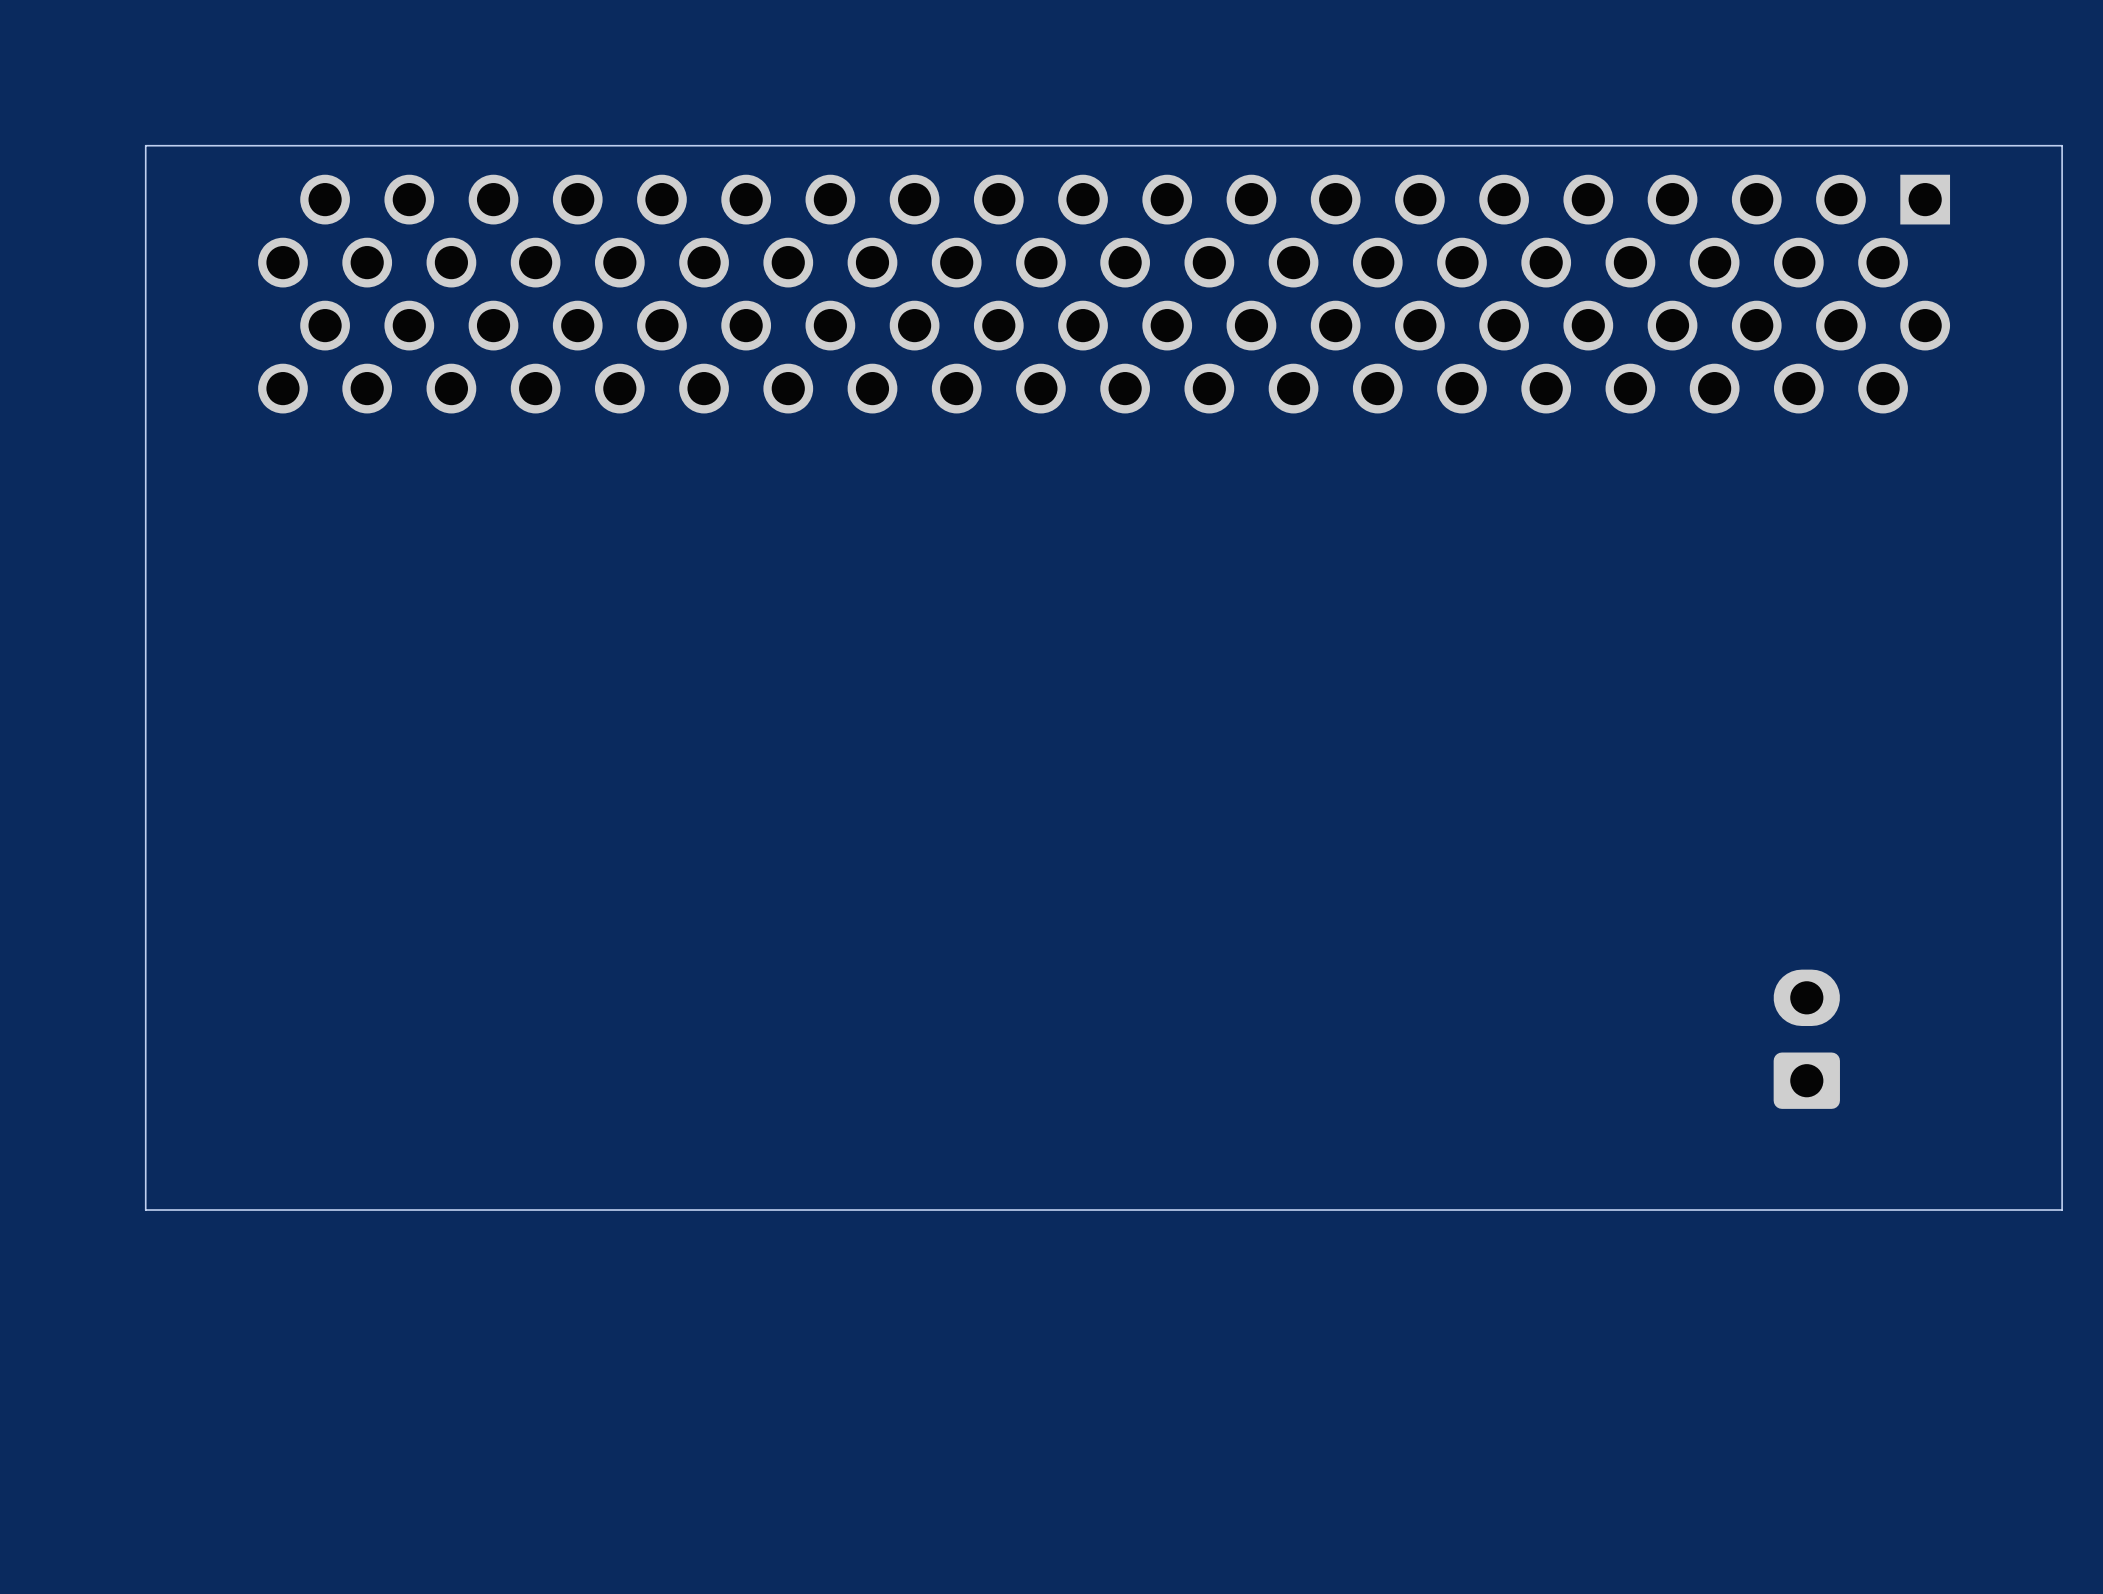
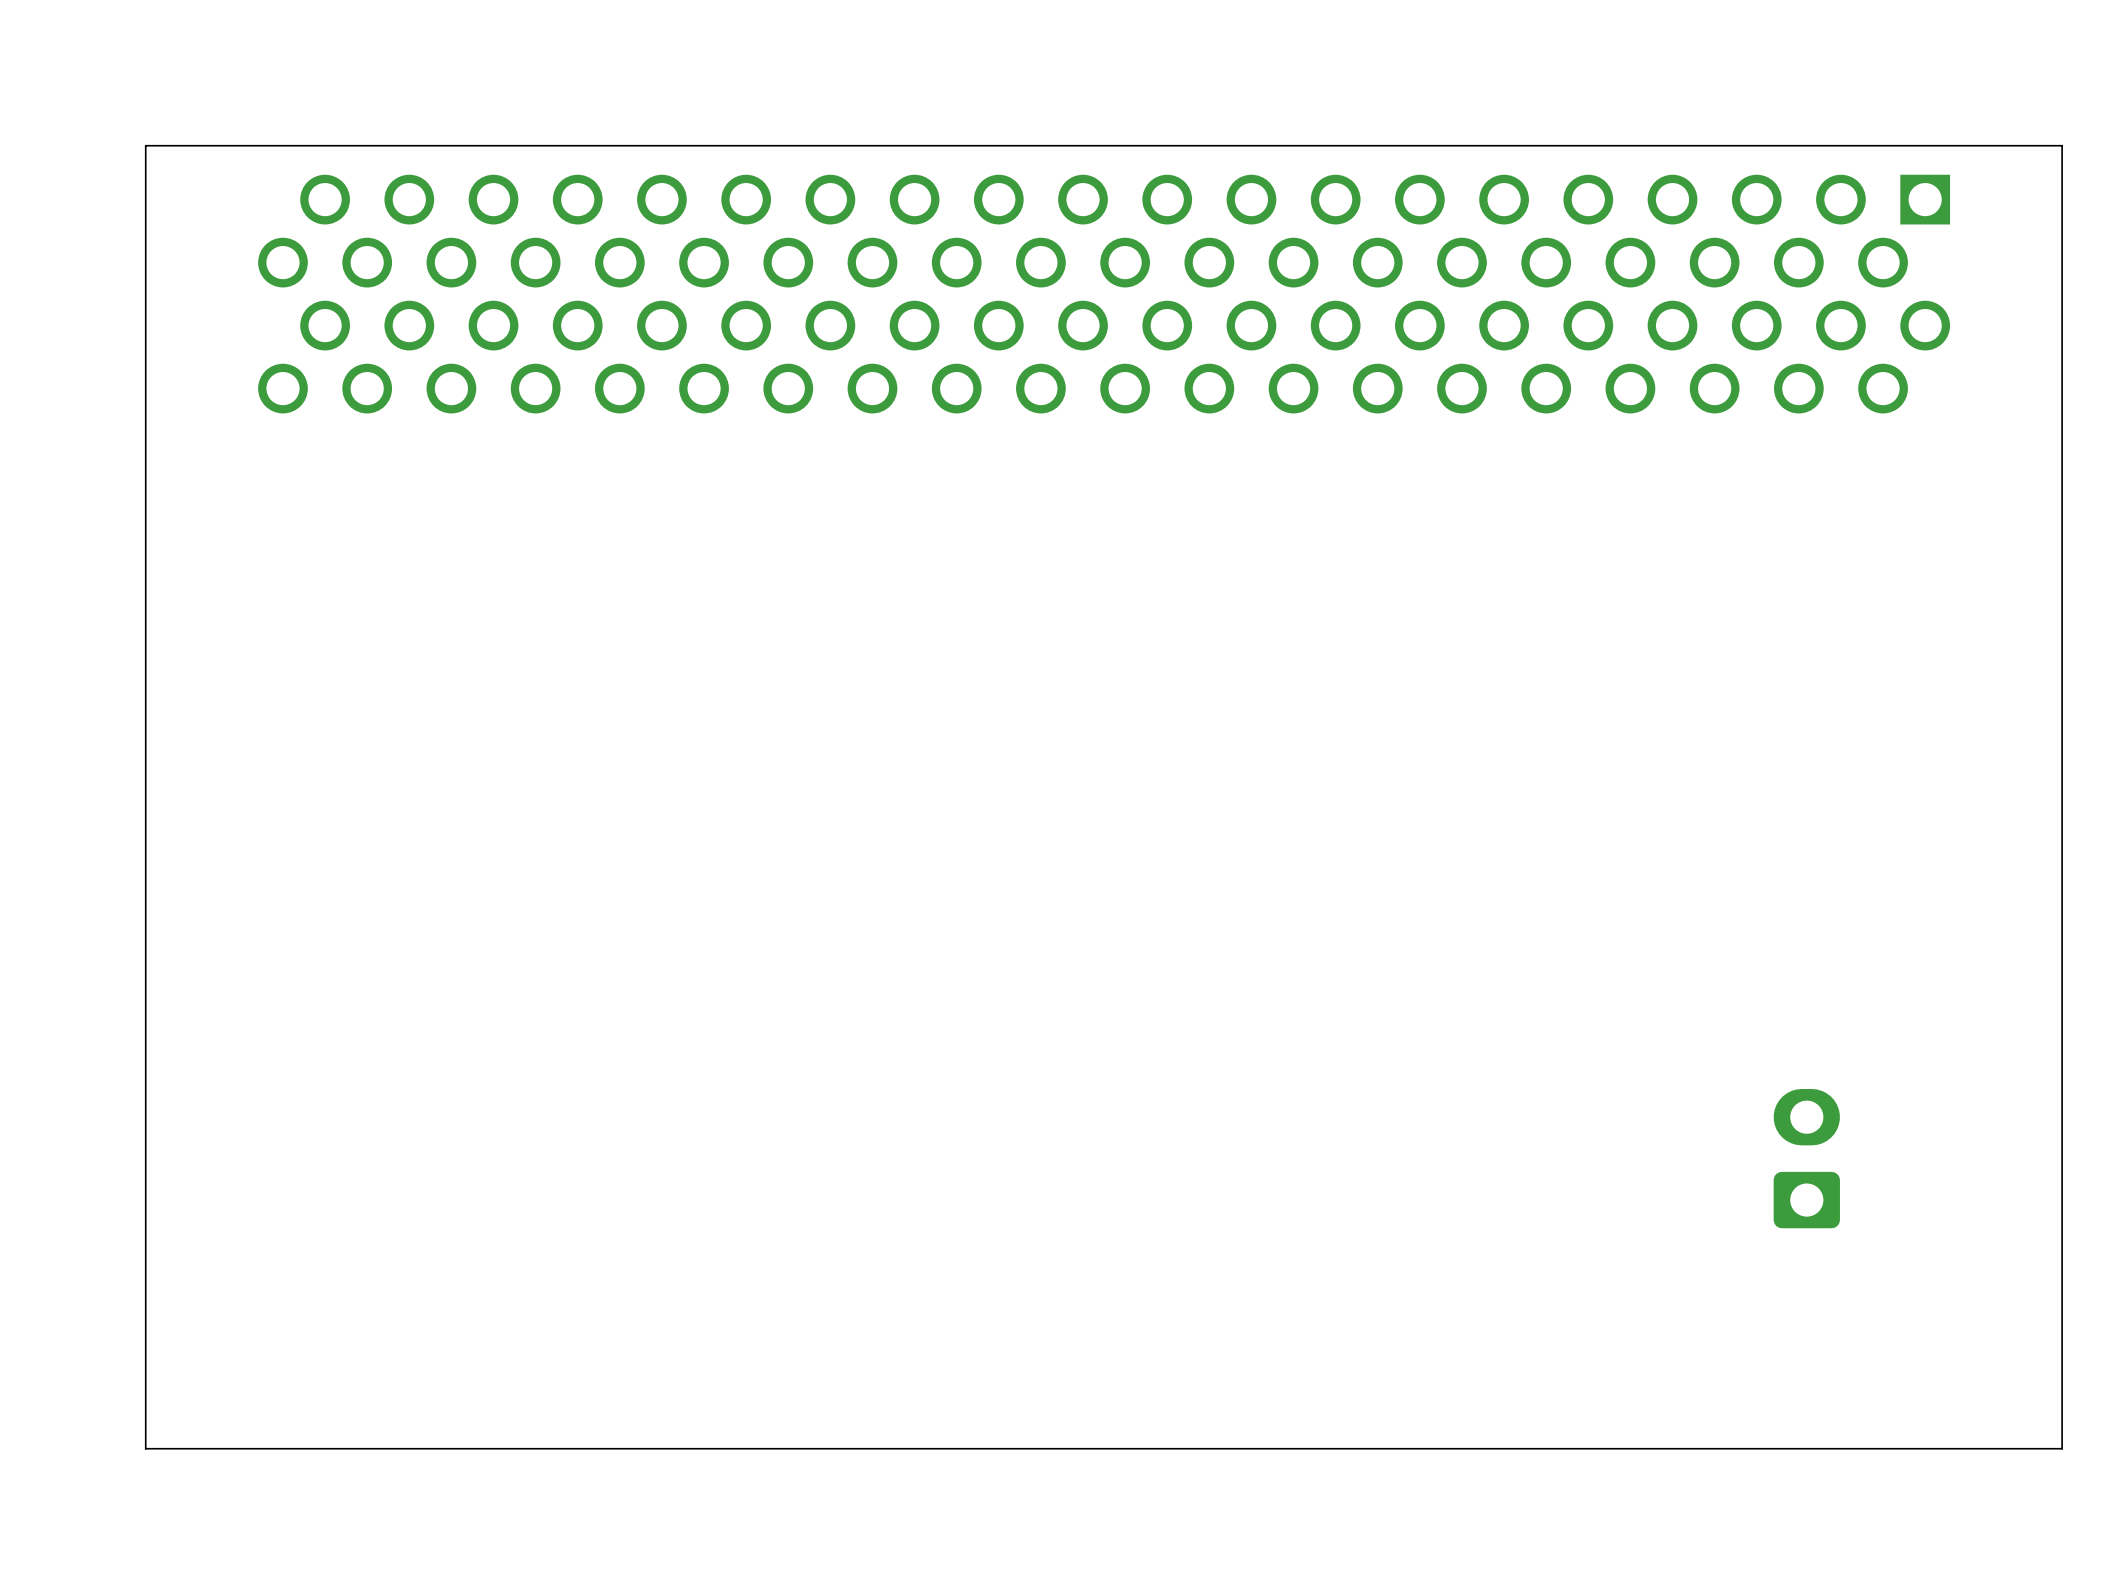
part position: (1806, 1039) -> (1806, 1158)
board edge: (2062, 1210) (145, 1210) -> (2062, 1210) (2062, 1448) (145, 1448) (145, 1210)

